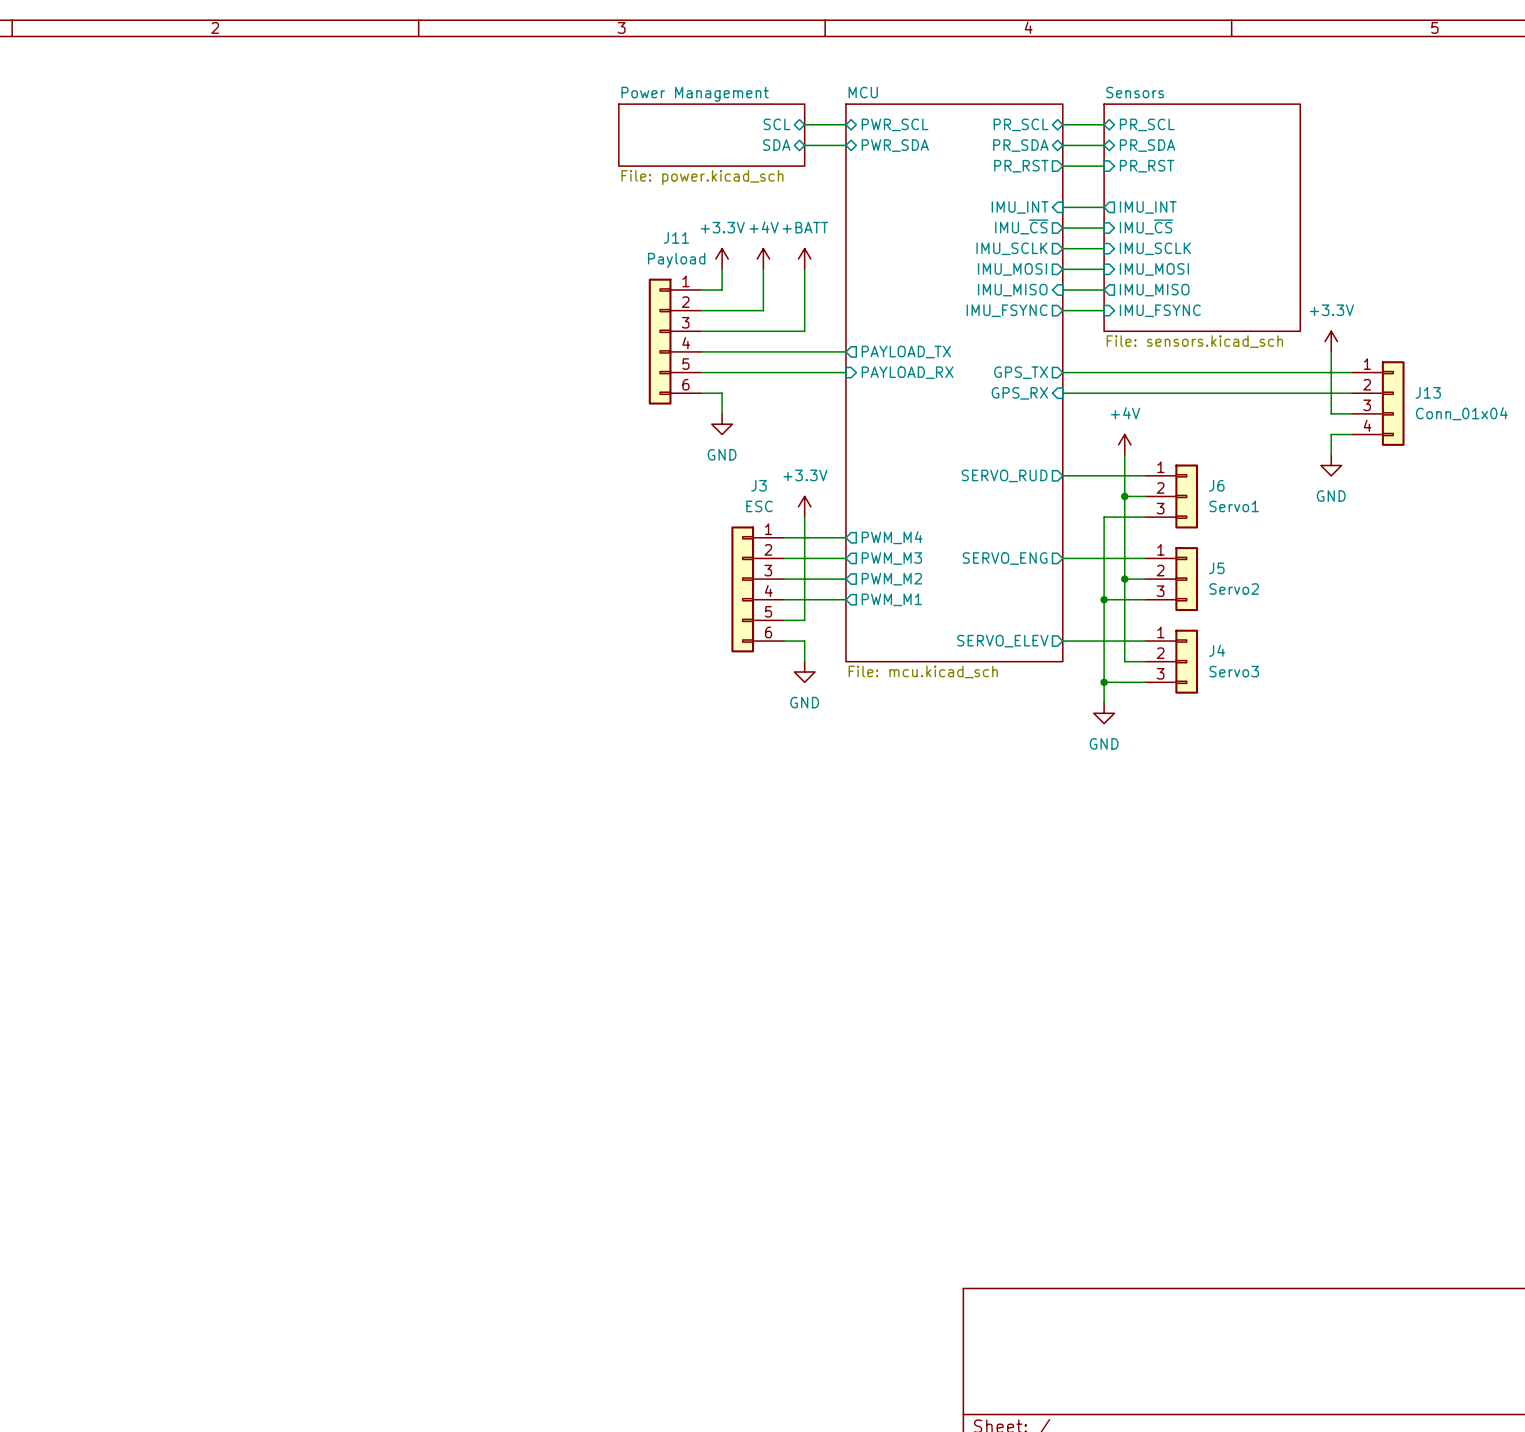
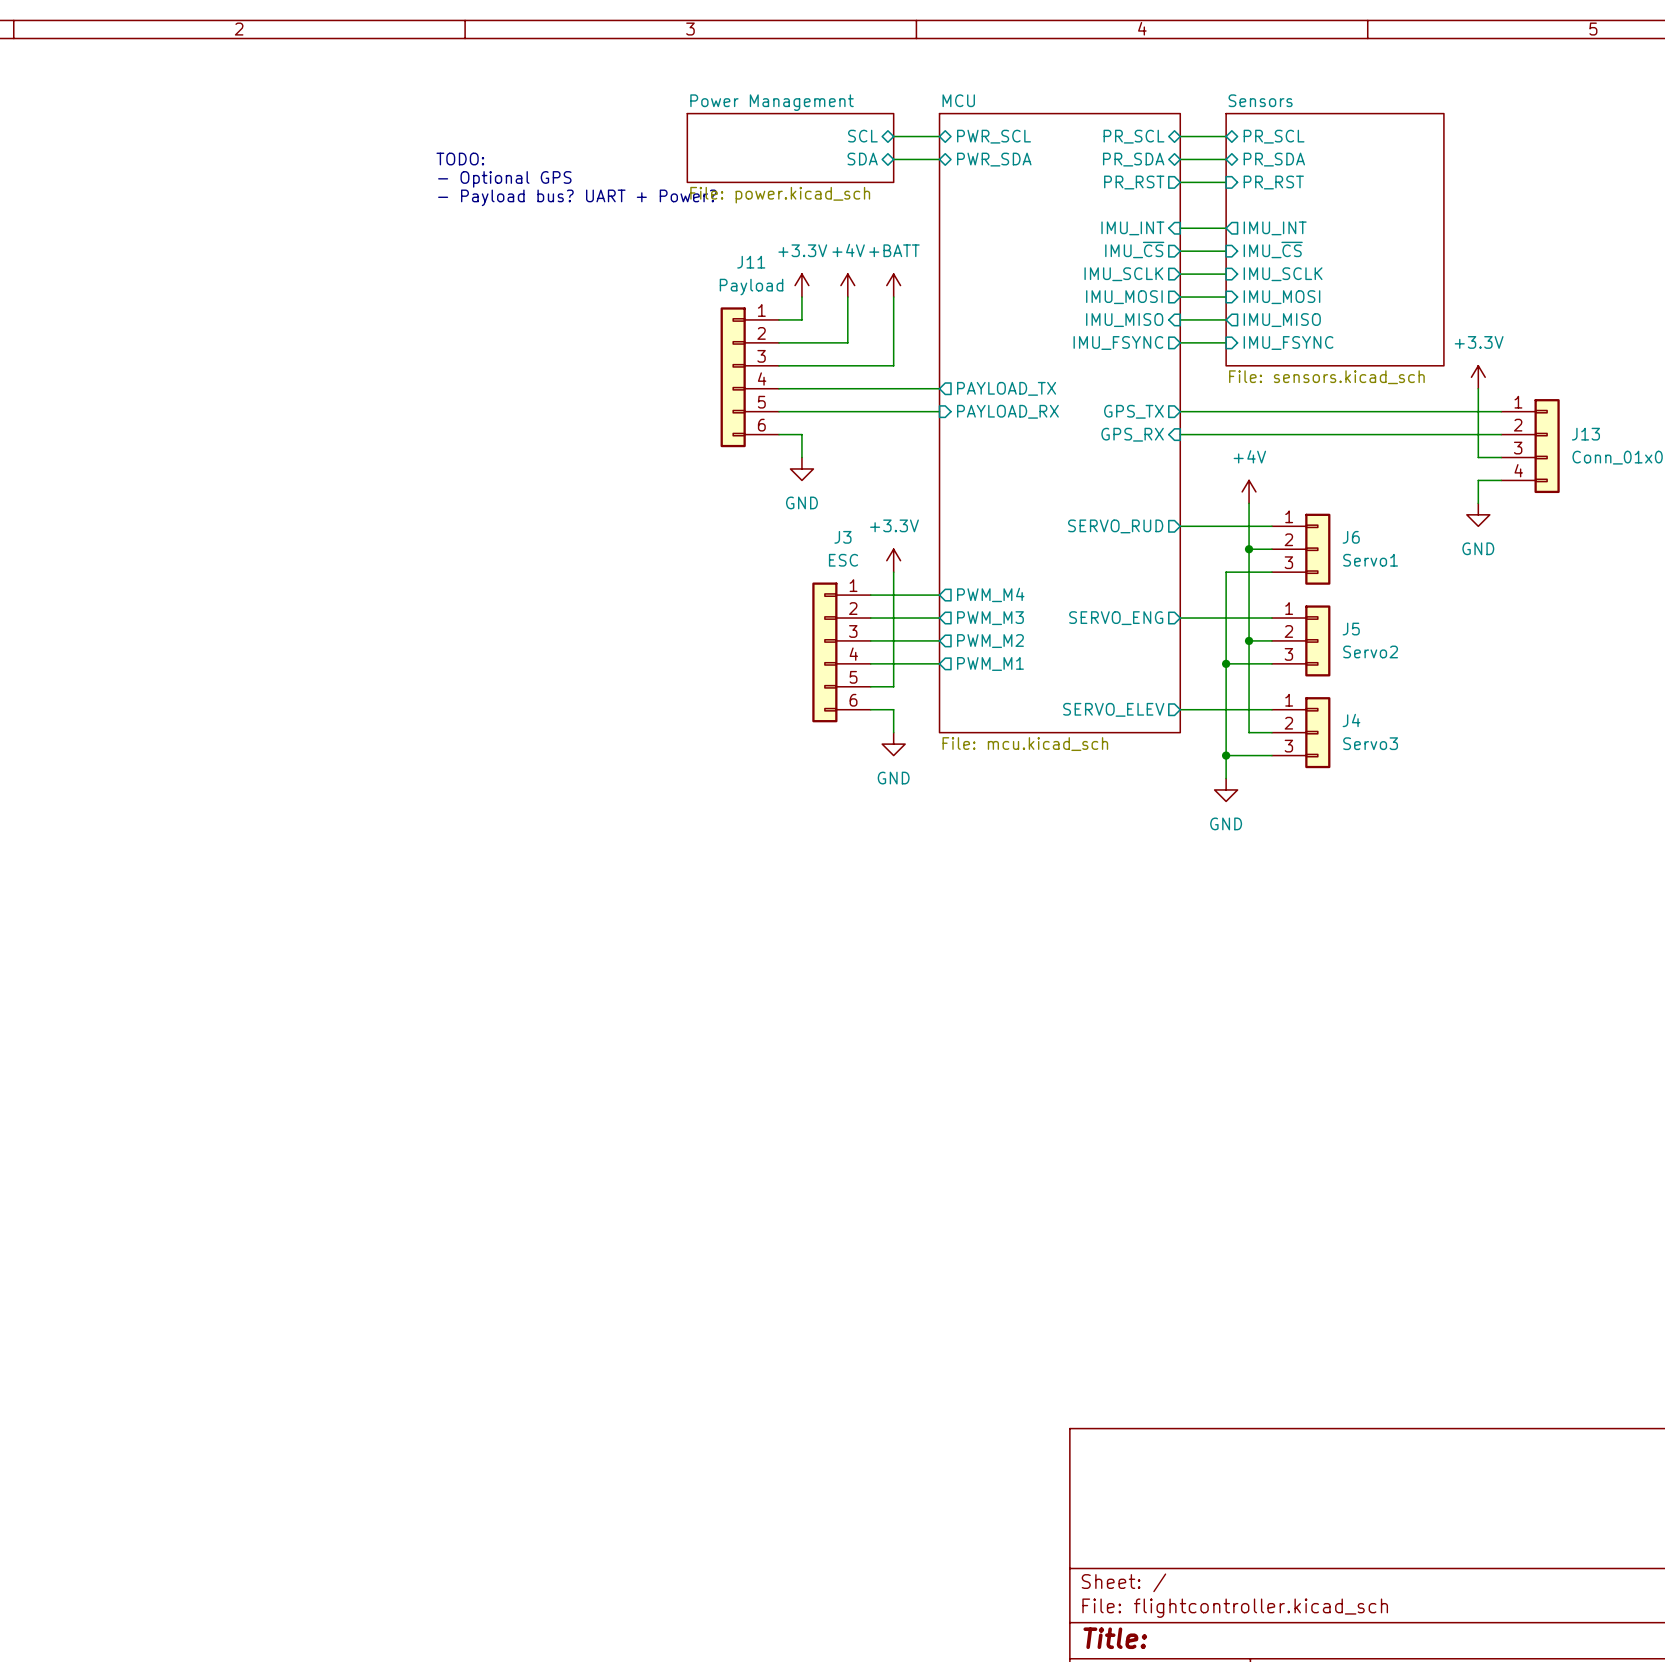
text: none -> TODO: (460, 159)
text: none -> - Optional GPS (504, 179)
text: none -> - Payload bus? UART + Power? (577, 197)

